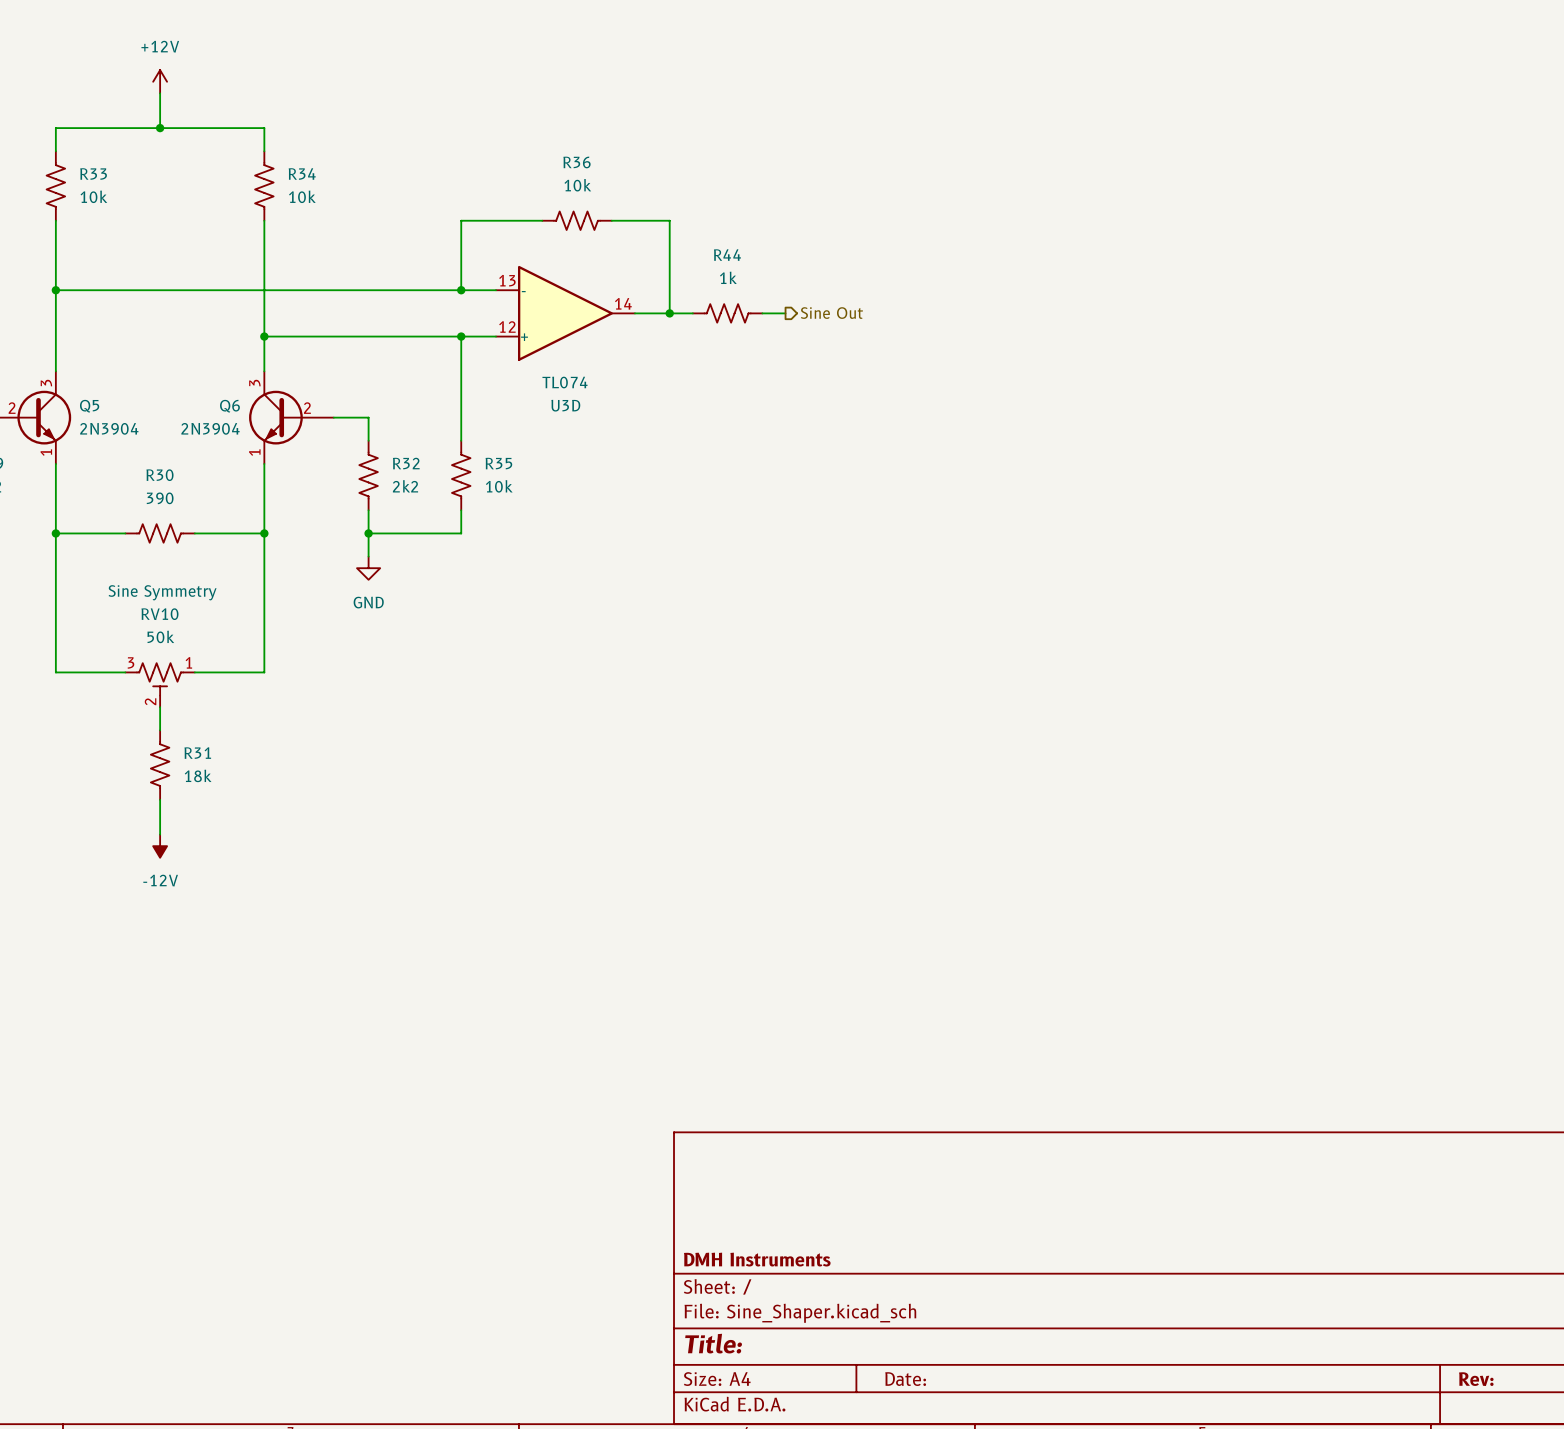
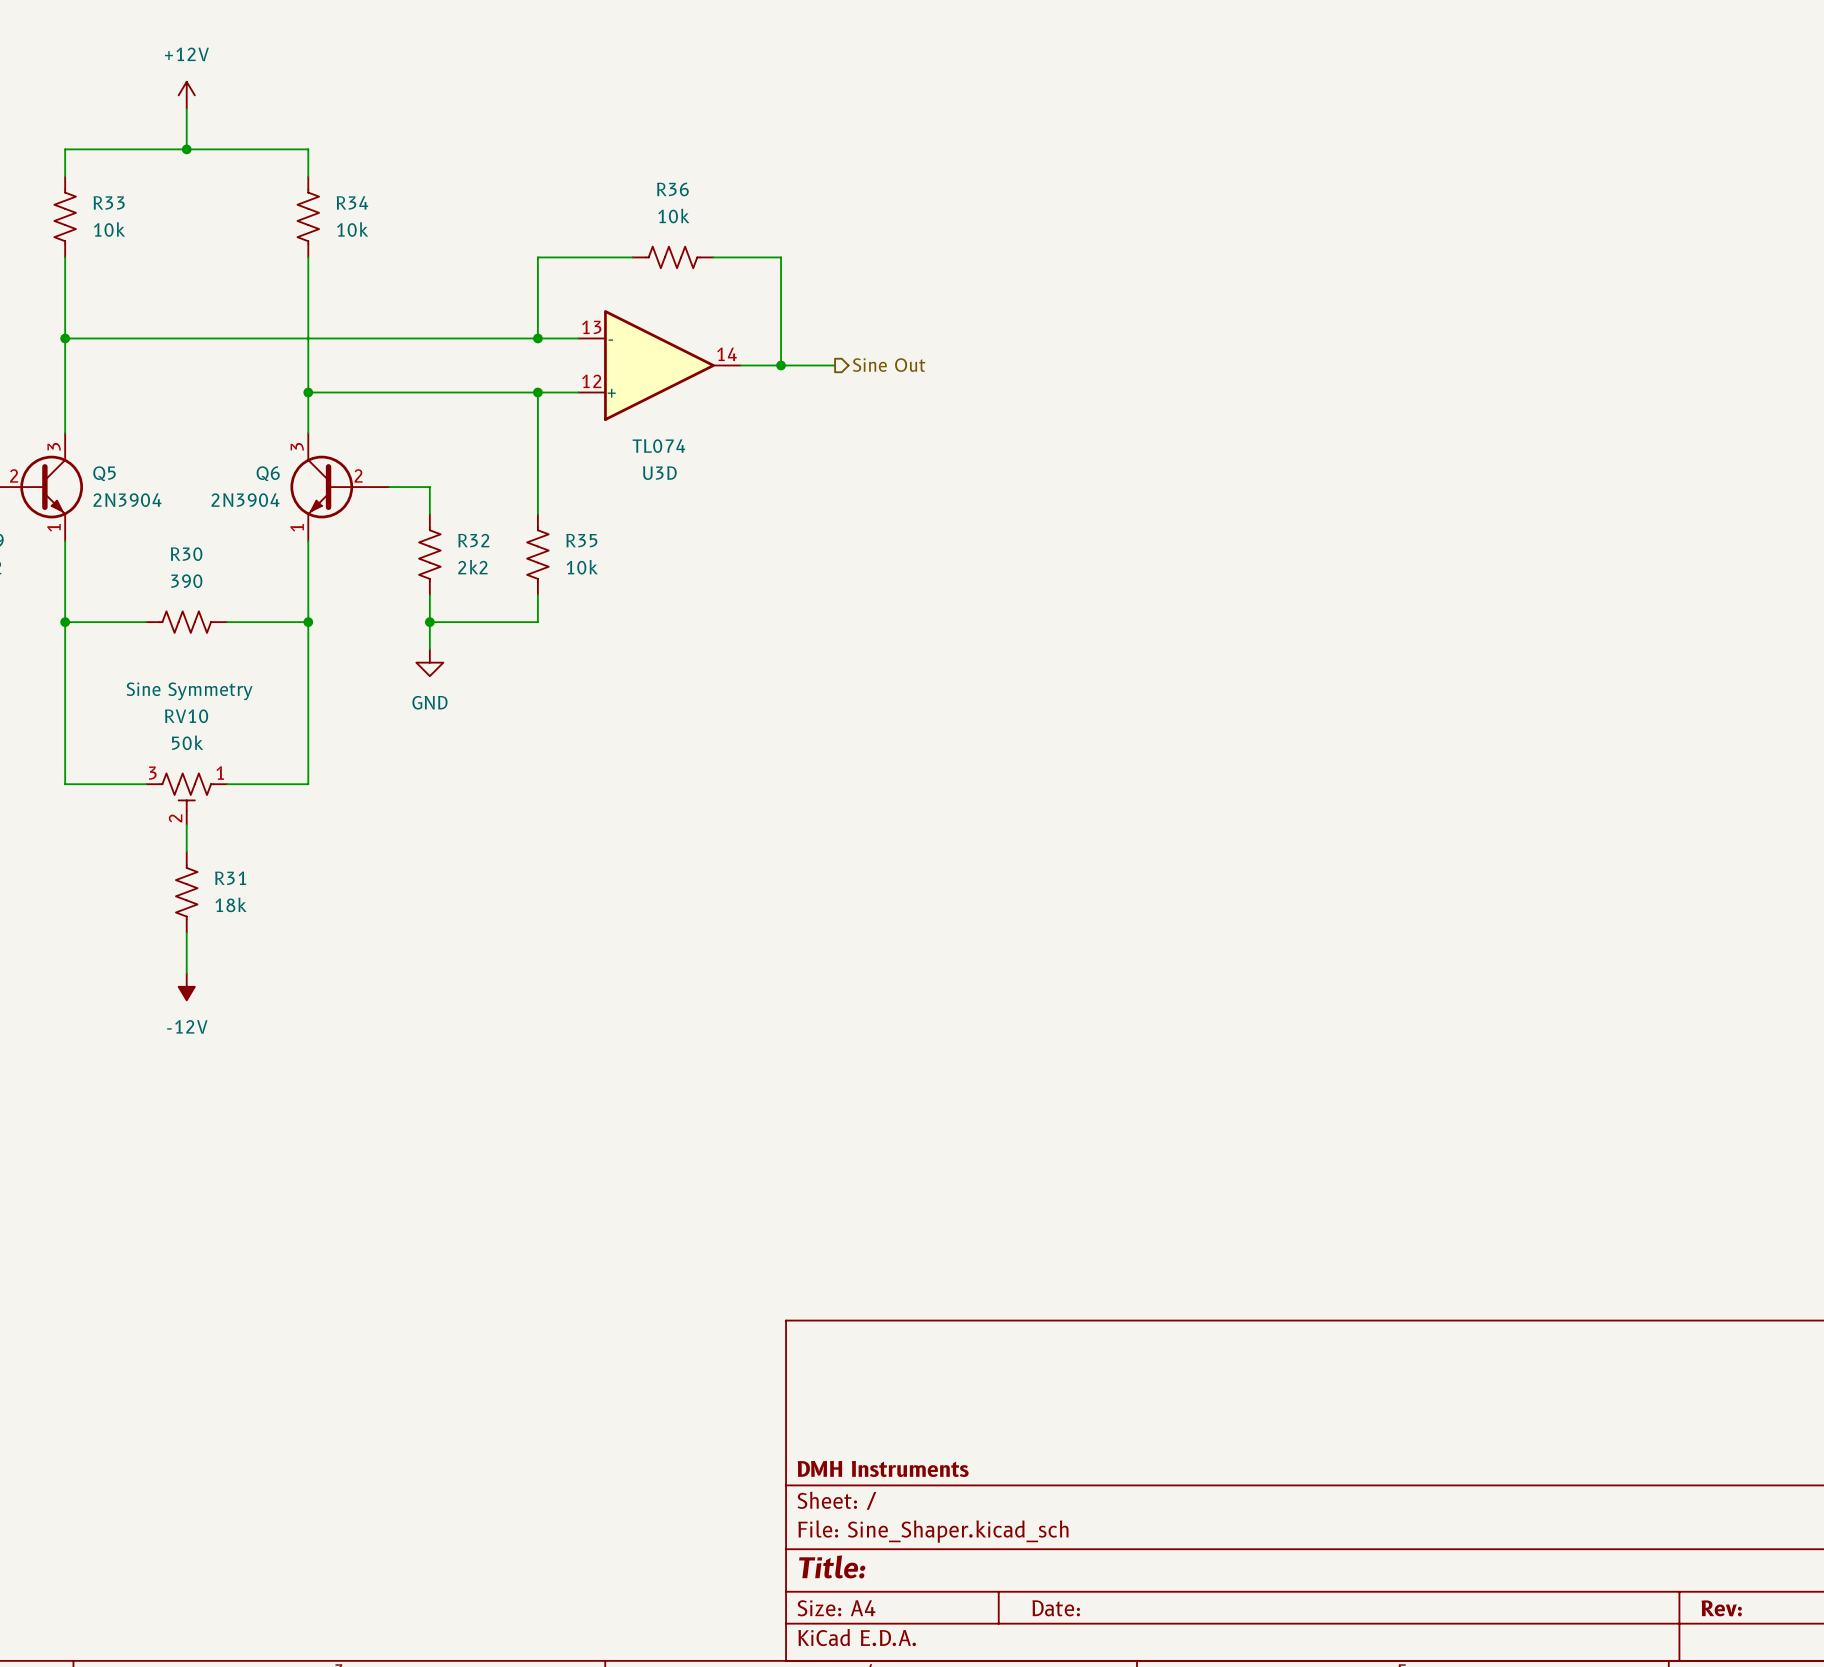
R44: 1k (727, 313) -> none
hierarchical label position: Sine Out (831, 313) -> Sine Out (889, 365)

